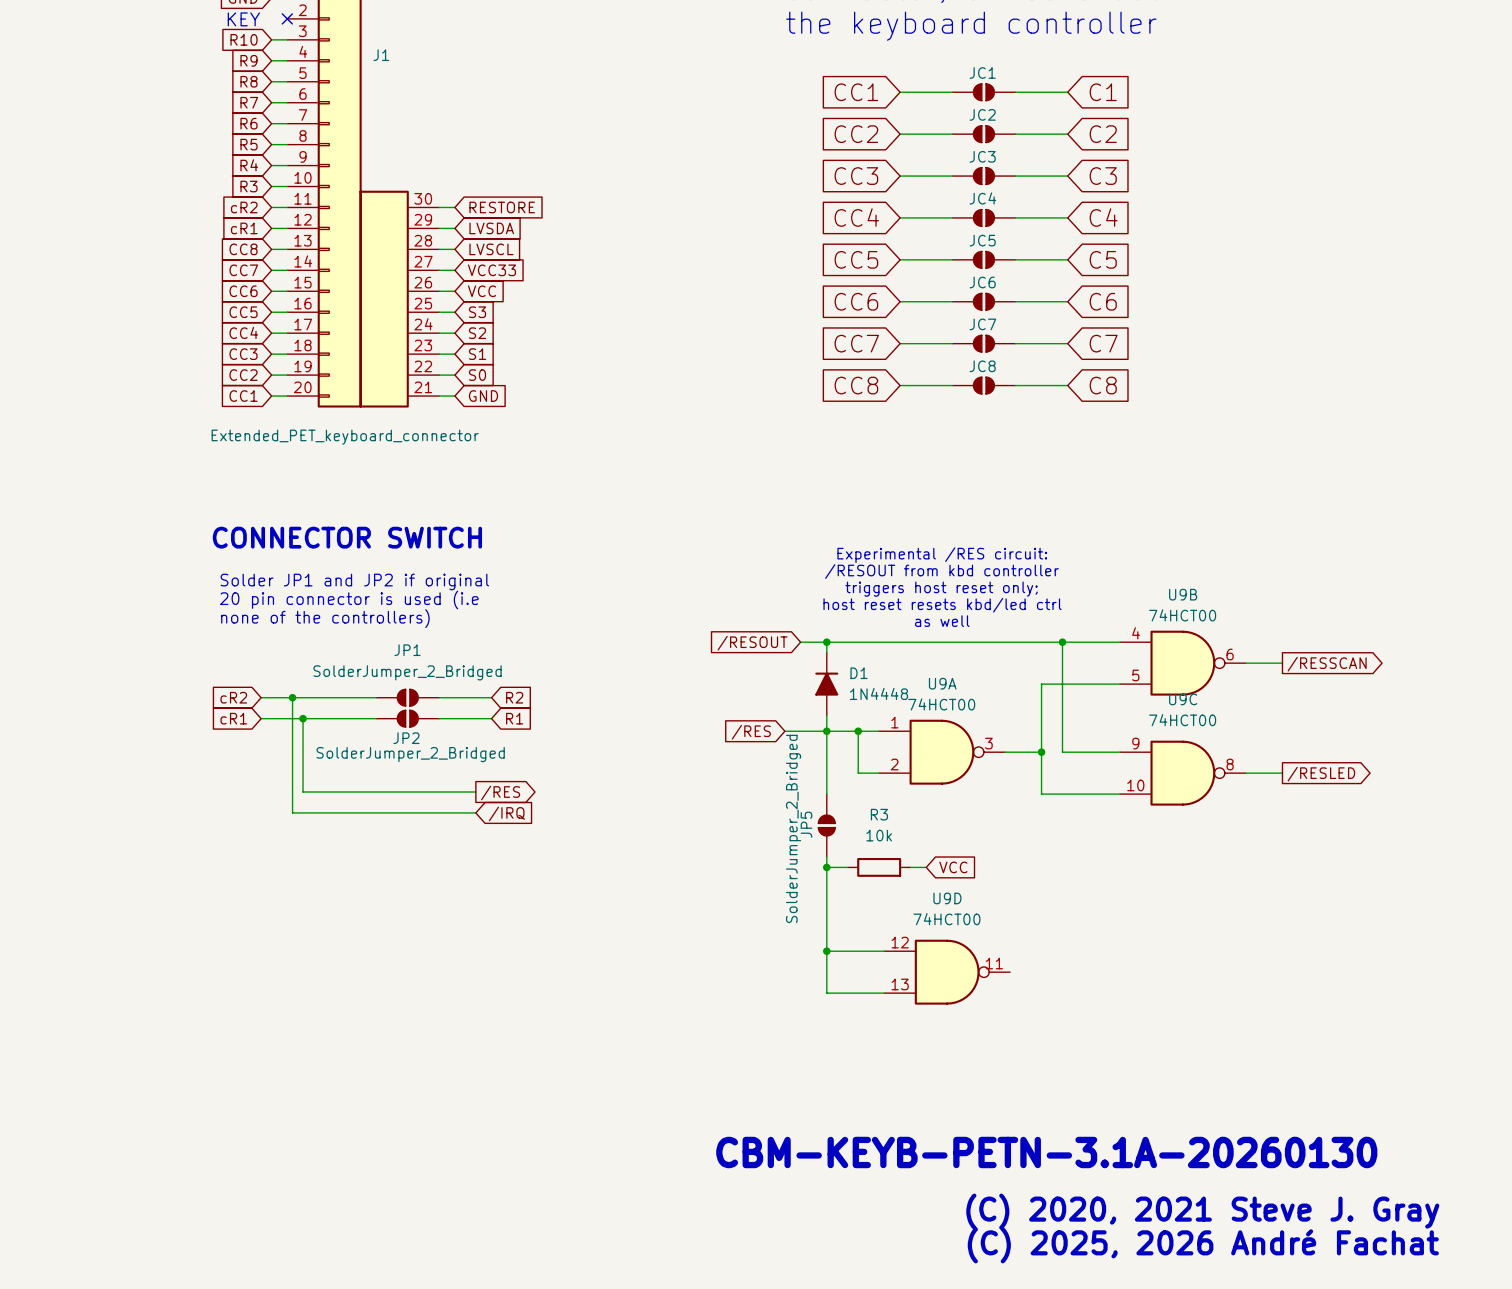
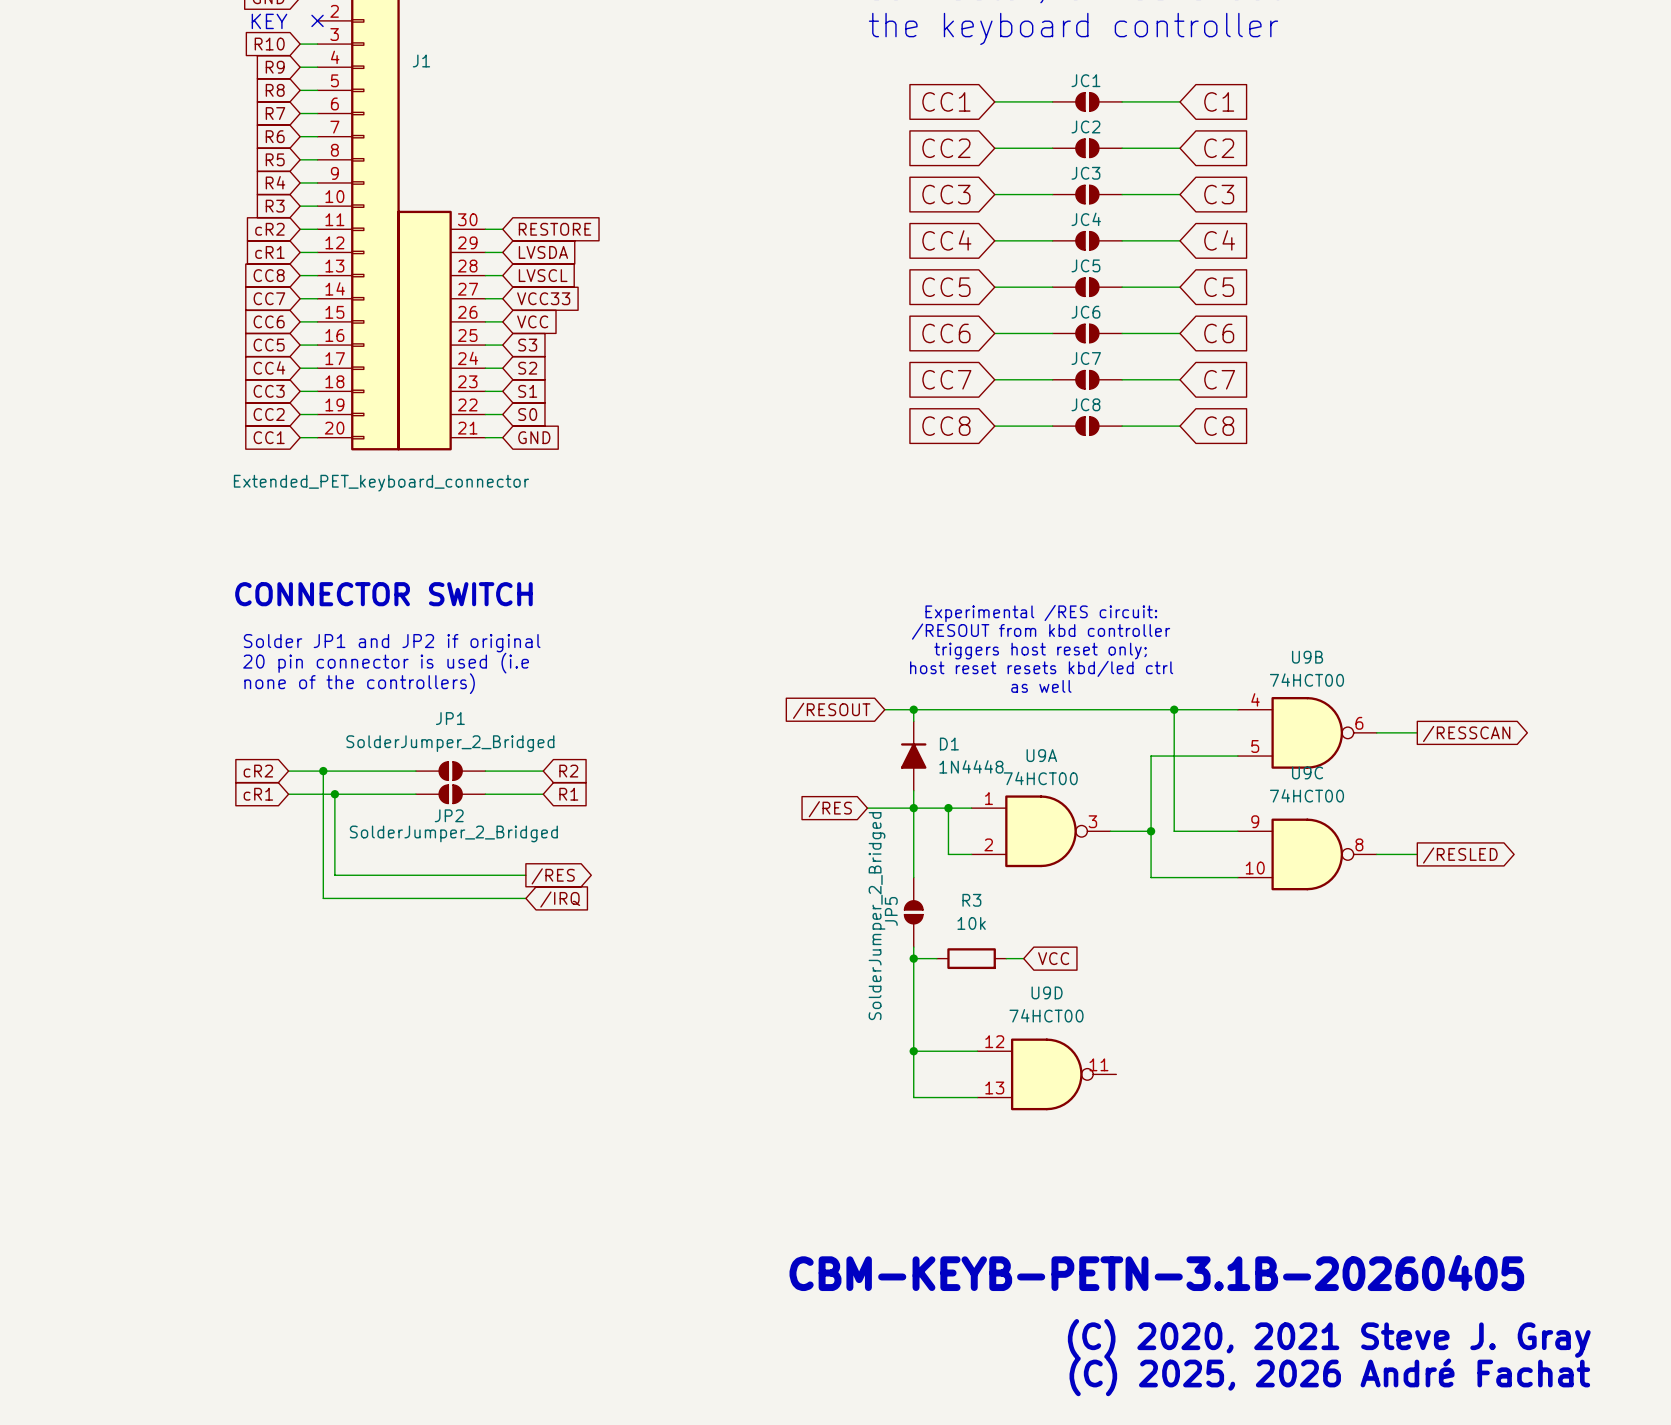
text: CBM-KEYB-PETN-3.1A-20260130 (1046, 1152) -> CBM-KEYB-PETN-3.1B-20260405 (1156, 1273)

